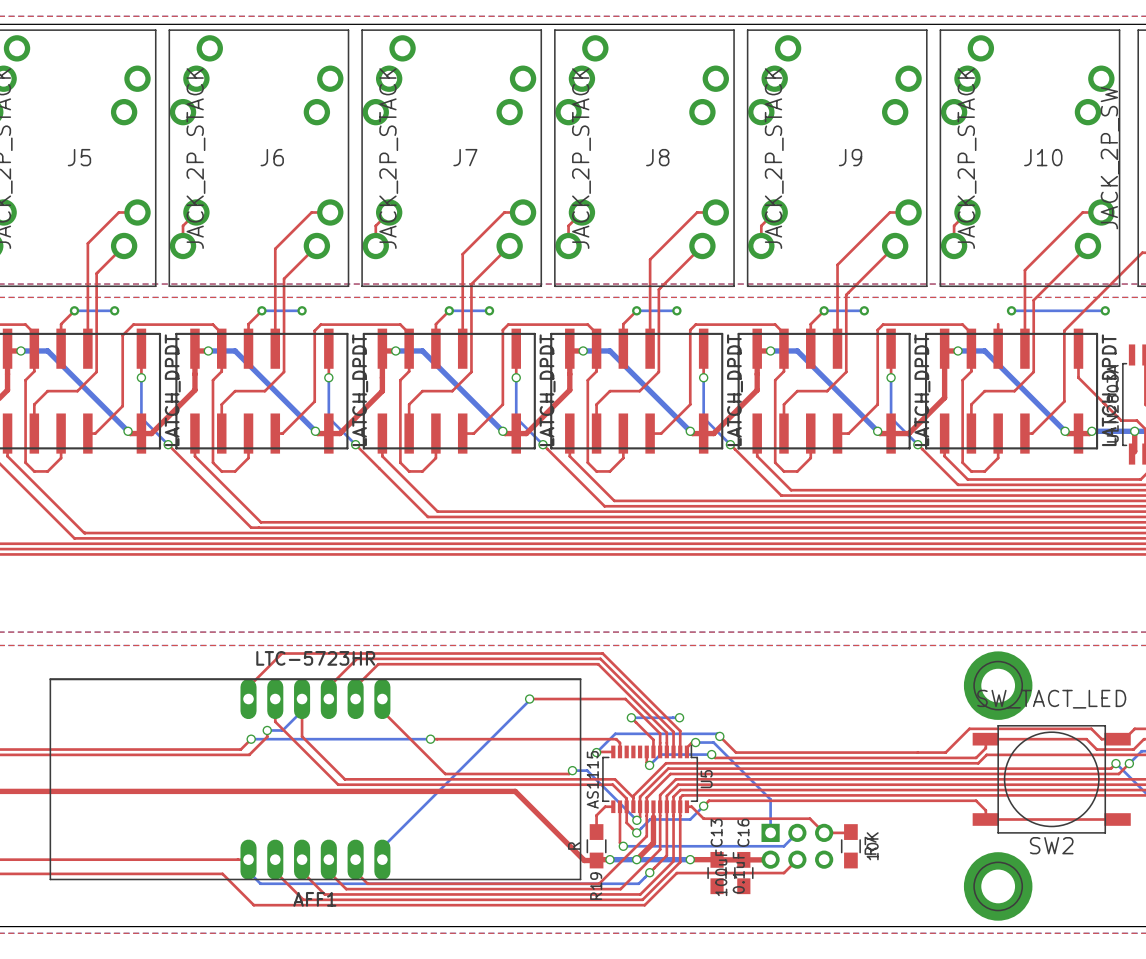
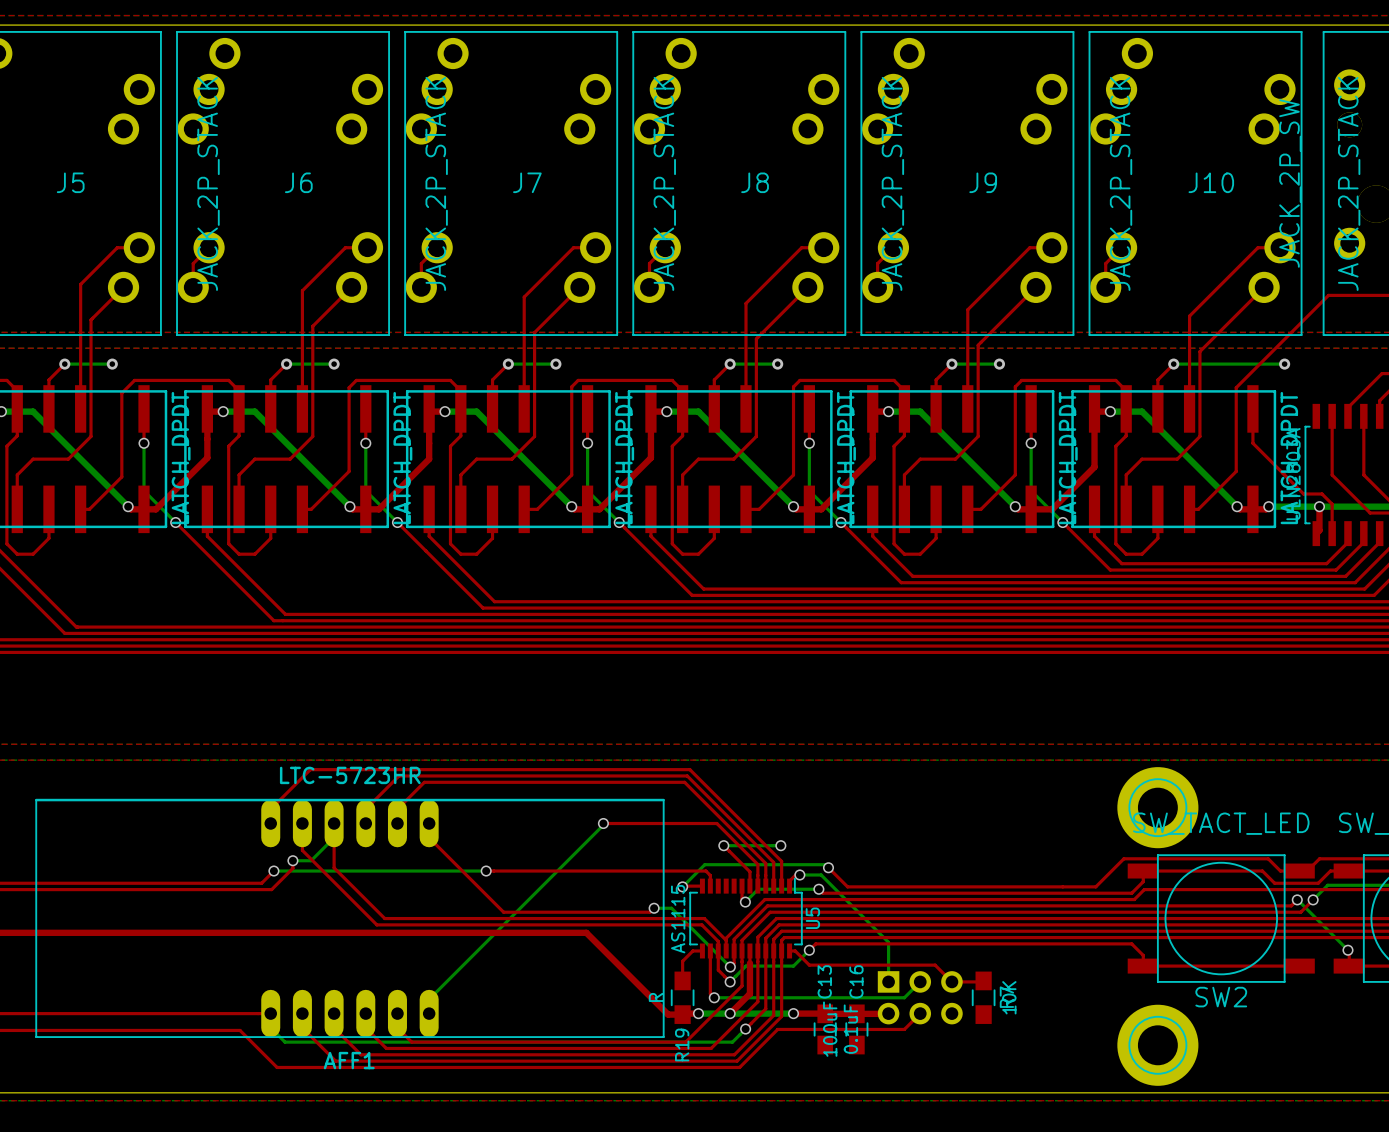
top track: none -> (1173, 364) (1157, 379)

